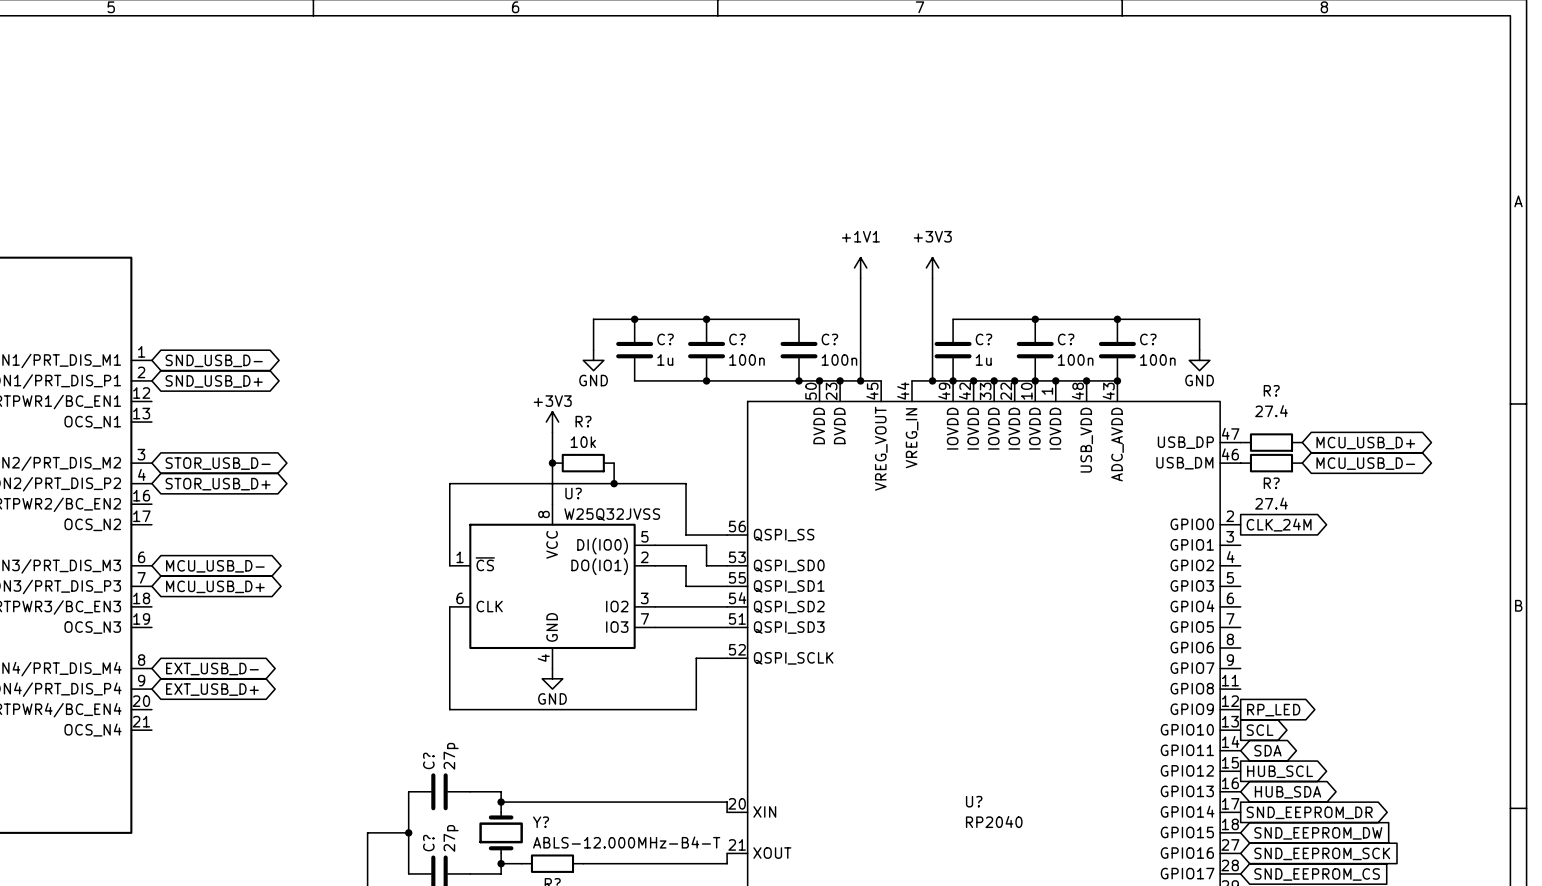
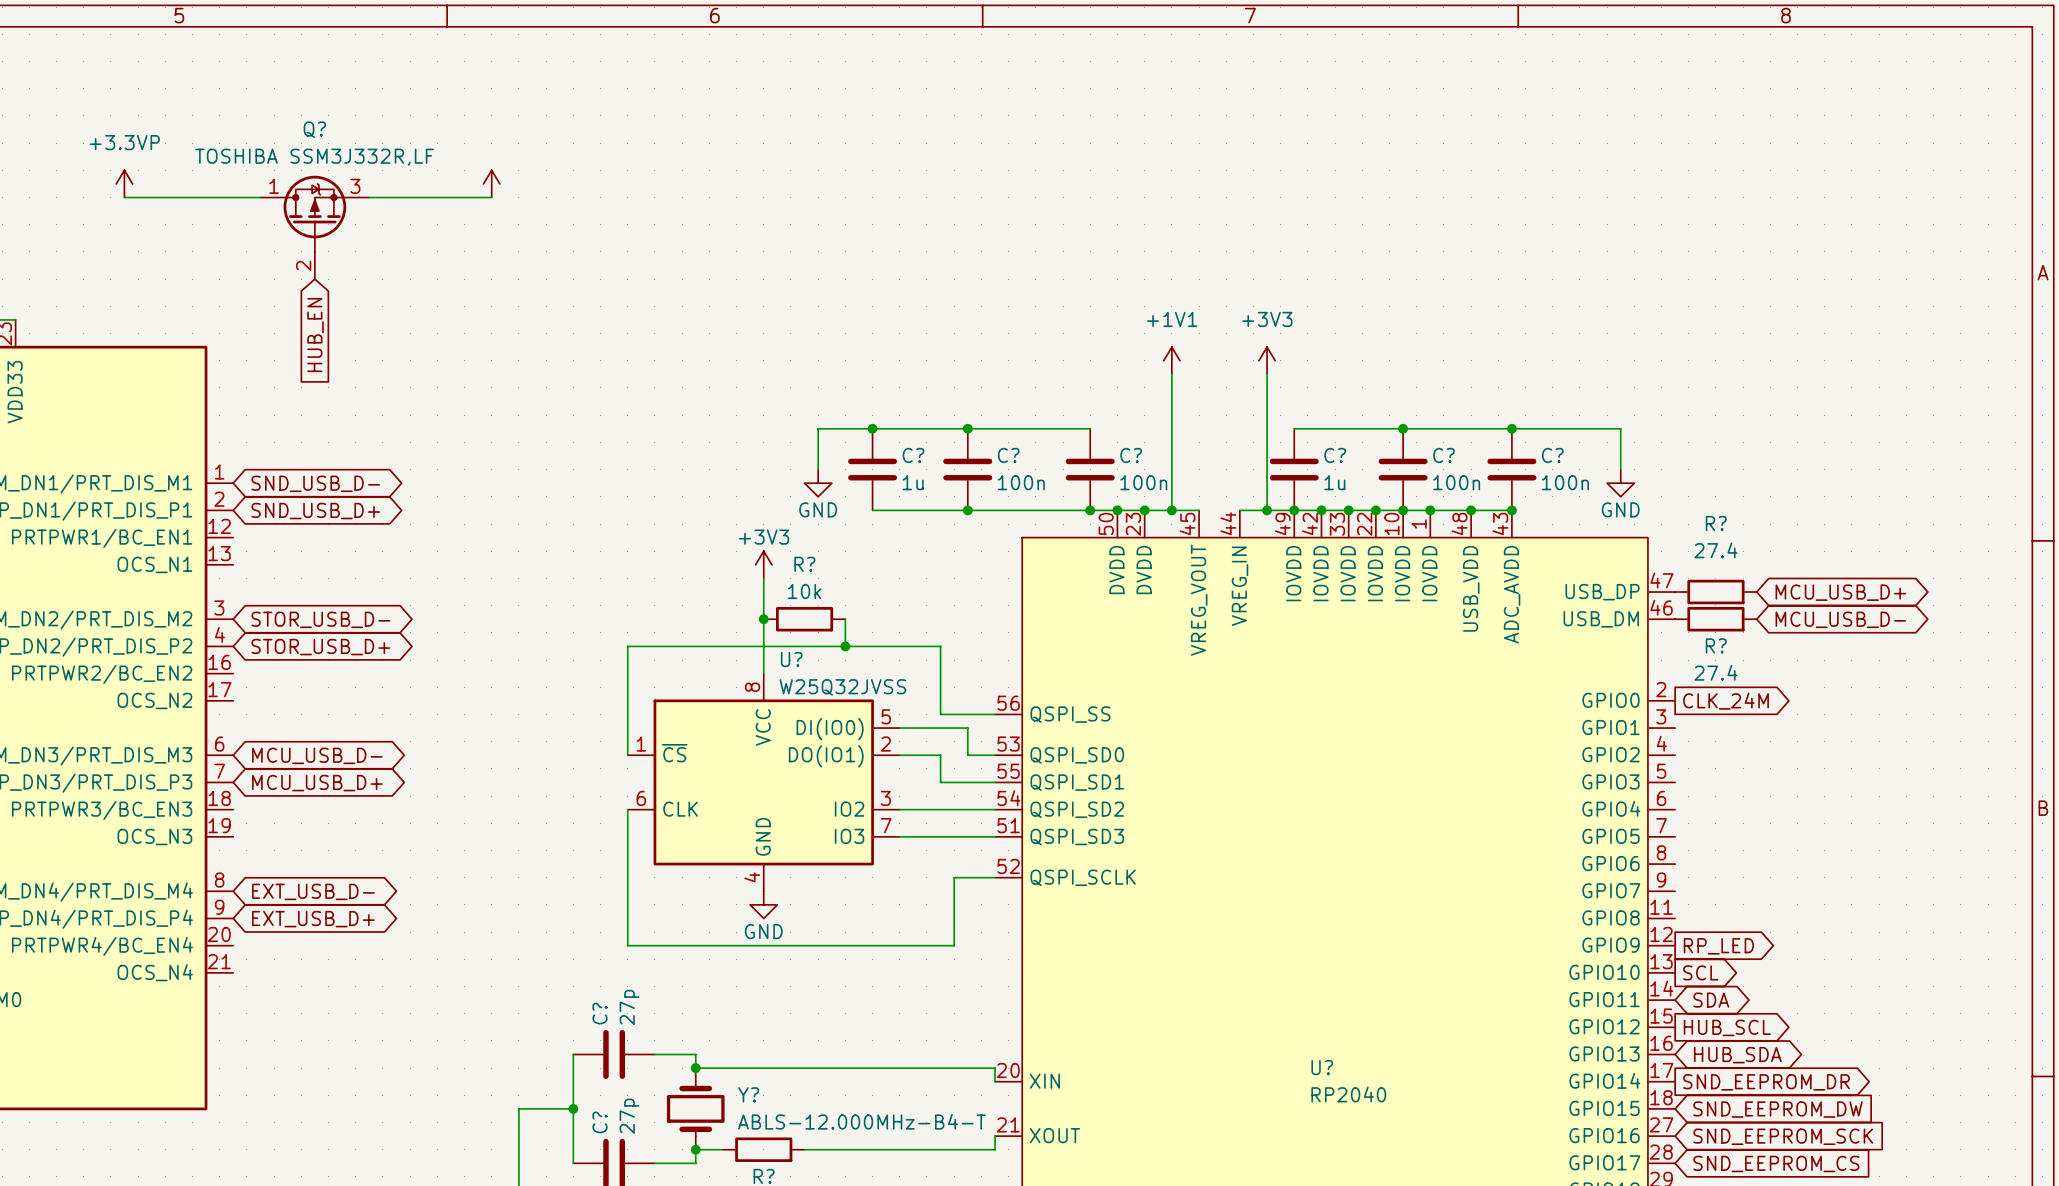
power symbol: none -> +3.3VP (124, 183)
power symbol: none -> (491, 183)
wire: none -> (124, 197) (260, 197)
wire: none -> (369, 197) (491, 197)
Q?: none -> TOSHIBA SSM3J332R,LF (314, 227)
global label: none -> HUB_EN (315, 335)

